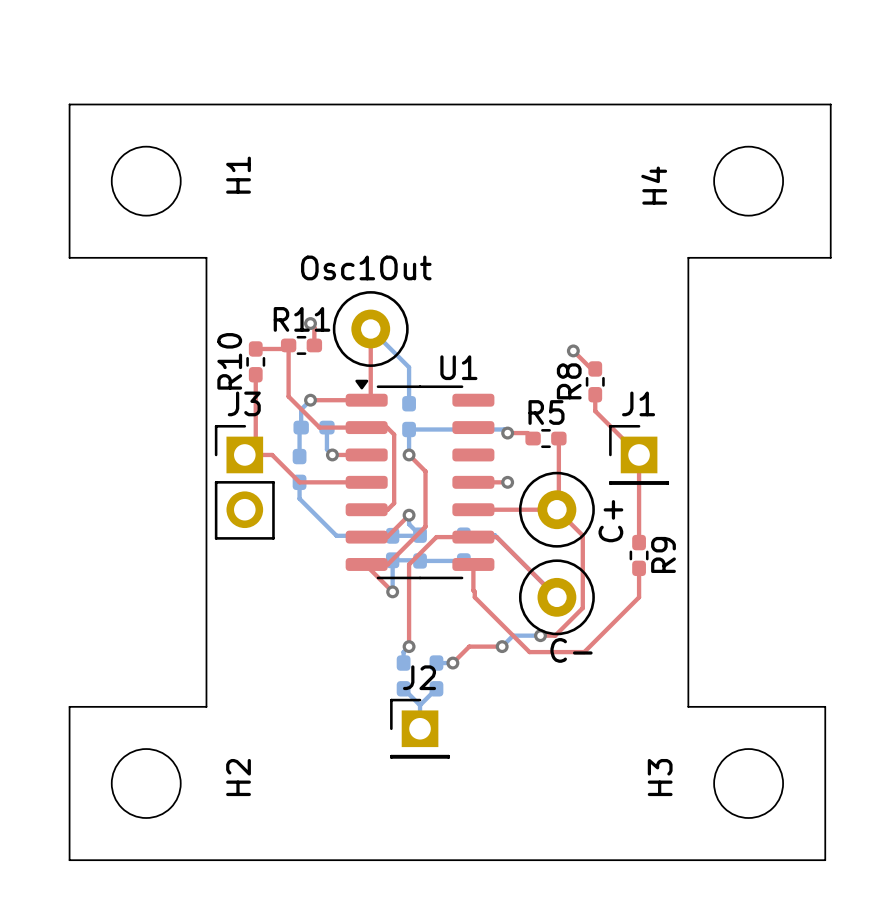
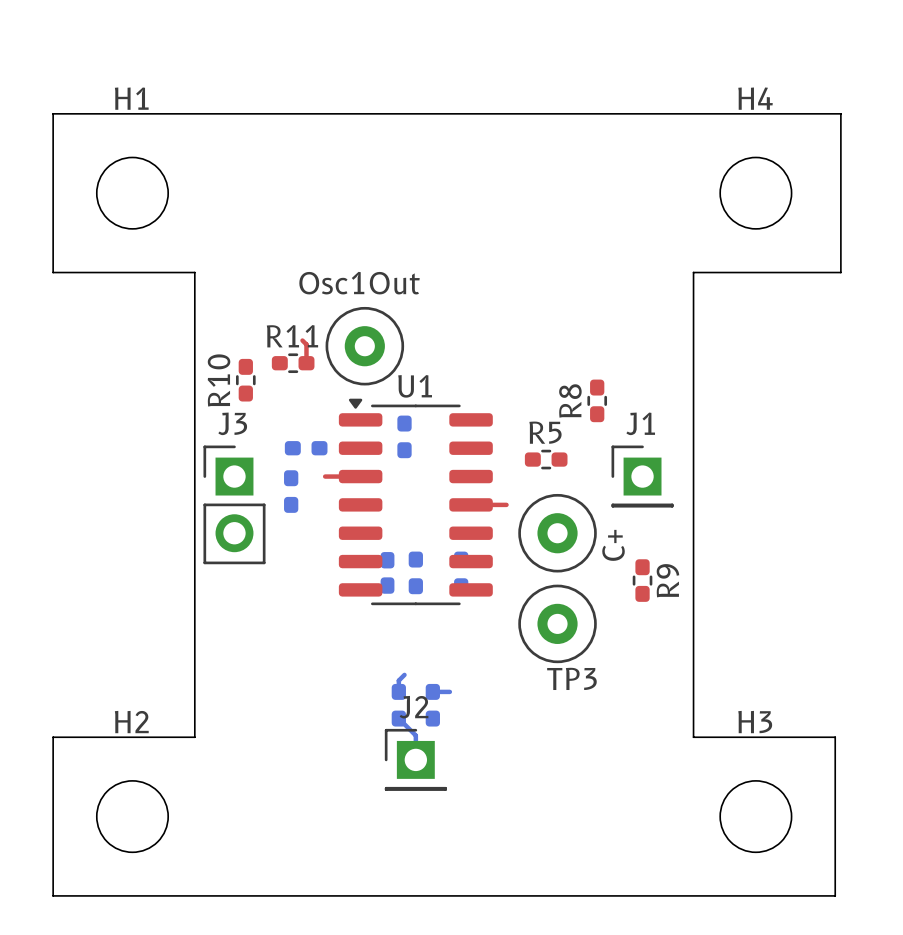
H1 name rotation: 0° (238, 175) -> 90° clockwise (131, 98)
H1 name position: H1 (238, 175) -> H1 (131, 98)
H4 name rotation: 0° (654, 185) -> 90° clockwise (755, 98)
H4 name position: H4 (654, 185) -> H4 (755, 98)
via: (310, 323) -> none
top track: (370, 329) (370, 396) (366, 400) (310, 400) -> none
bottom track: (370, 329) (409, 367) (409, 403) -> none
top track: (255, 348) (285, 348) (288, 345) (288, 396) (319, 427) (387, 427) (394, 434) (394, 503) (387, 509) (366, 509) -> none
top track: (573, 350) (591, 368) (595, 368) -> none
via: (573, 350) -> none
U1 name position: U1 (458, 367) -> U1 (415, 386)
top track: (255, 374) (255, 444) (244, 454) (272, 454) (299, 482) (366, 482) -> none
top track: (595, 394) (595, 411) (639, 454) (639, 542) -> none
bottom track: (310, 400) (301, 409) (299, 456) -> none
via: (310, 400) -> none
bottom track: (326, 427) (326, 449) (332, 454) -> none
top track: (507, 433) (527, 433) (533, 438) -> none
bottom track: (507, 433) (504, 429) (409, 429) (409, 454) -> none
via: (507, 433) -> none
top track: (558, 438) (558, 507) (556, 509) -> none
via: (332, 454) -> none
top track: (409, 454) (425, 471) (425, 526) (387, 564) (366, 564) (392, 591) -> none
via: (409, 454) -> none
bottom track: (299, 482) (299, 498) (336, 535) (419, 535) (409, 524) (409, 515) -> none
via: (507, 482) -> none
top track: (473, 509) (556, 509) -> none
top track: (556, 509) (582, 535) (582, 608) (555, 635) (540, 635) -> none
top track: (409, 515) (387, 537) (366, 537) -> none
via: (409, 515) -> none
bottom track: (463, 560) (392, 560) (392, 591) -> none
top track: (473, 564) (474, 597) (529, 652) (584, 652) (639, 597) (639, 568) -> none
via: (392, 591) -> none
top track: (556, 597) (496, 537) (436, 537) (409, 564) (409, 646) -> none
bottom track: (540, 635) (513, 635) (502, 646) -> none
via: (540, 635) -> none
via: (409, 646) -> none
top track: (502, 646) (469, 646) (452, 663) -> none
via: (502, 646) -> none
C- name: C- (571, 650) -> TP3 (571, 678)
via: (452, 663) -> none
bottom track: (436, 688) (420, 705) -> none
H2 name rotation: 0° (238, 777) -> 90° clockwise (131, 722)
H2 name position: H2 (238, 777) -> H2 (131, 722)
H3 name rotation: 0° (660, 777) -> 90° clockwise (755, 722)
H3 name position: H3 (660, 777) -> H3 (755, 722)

